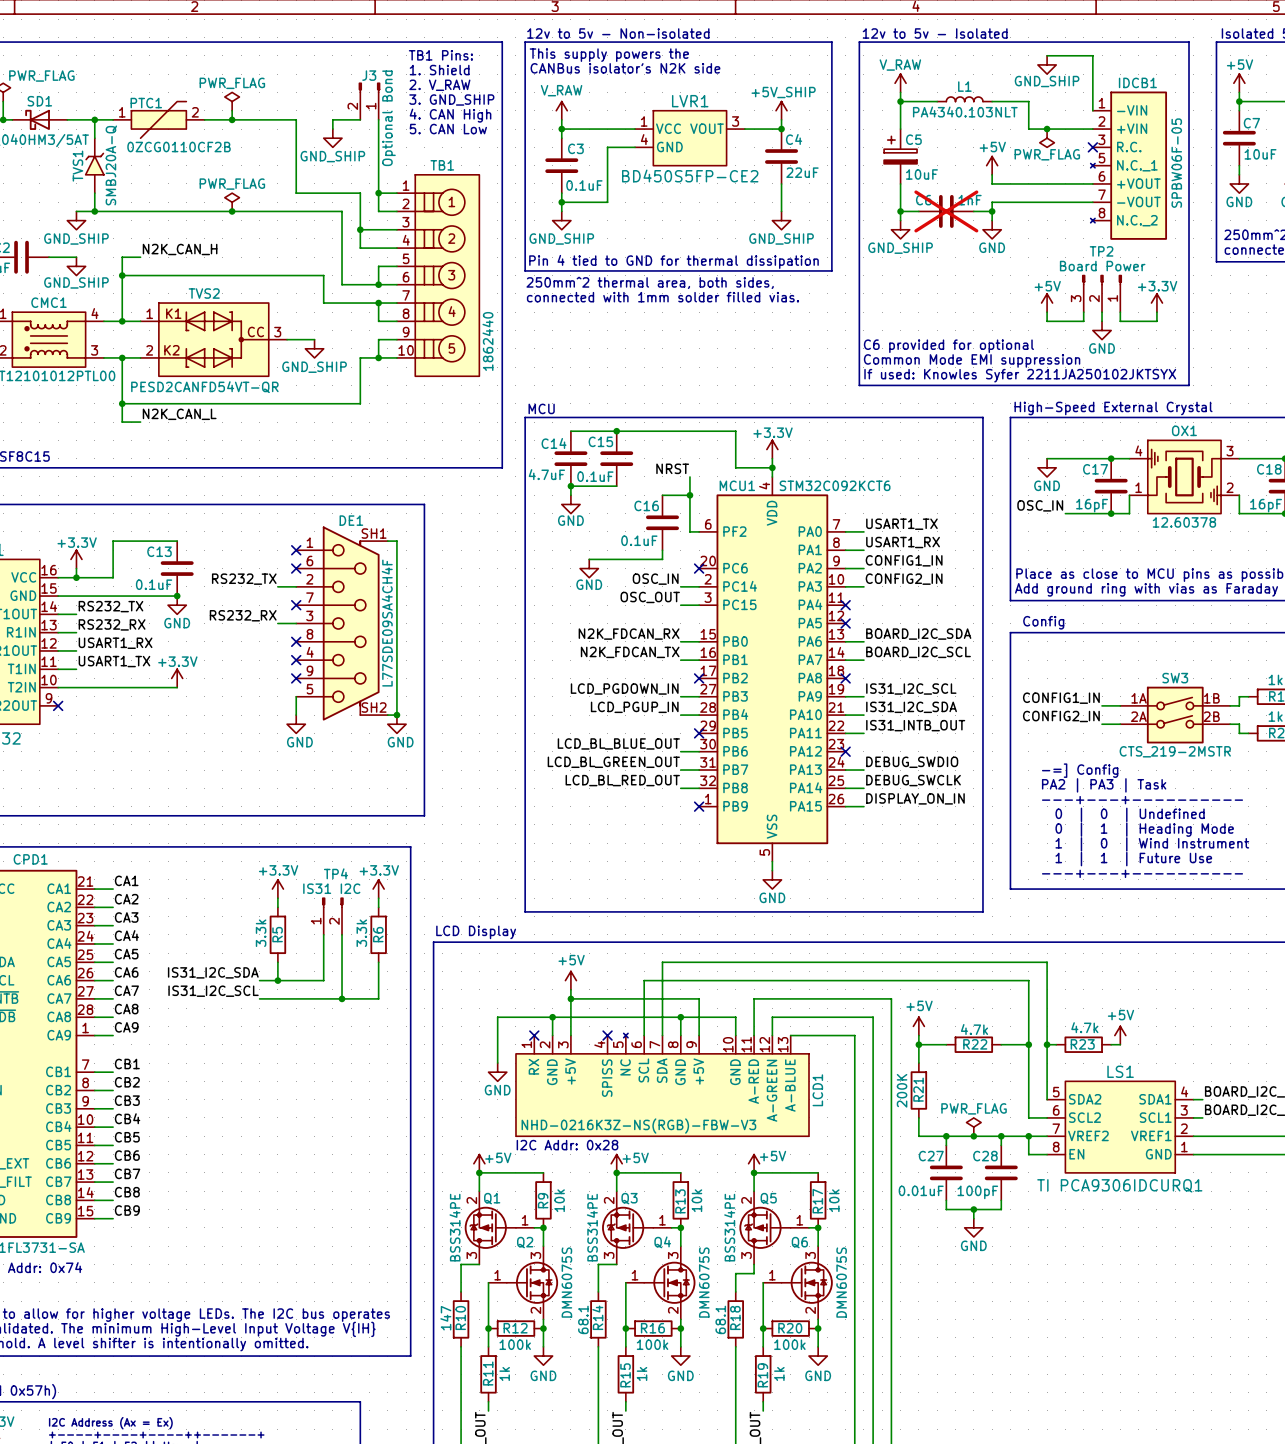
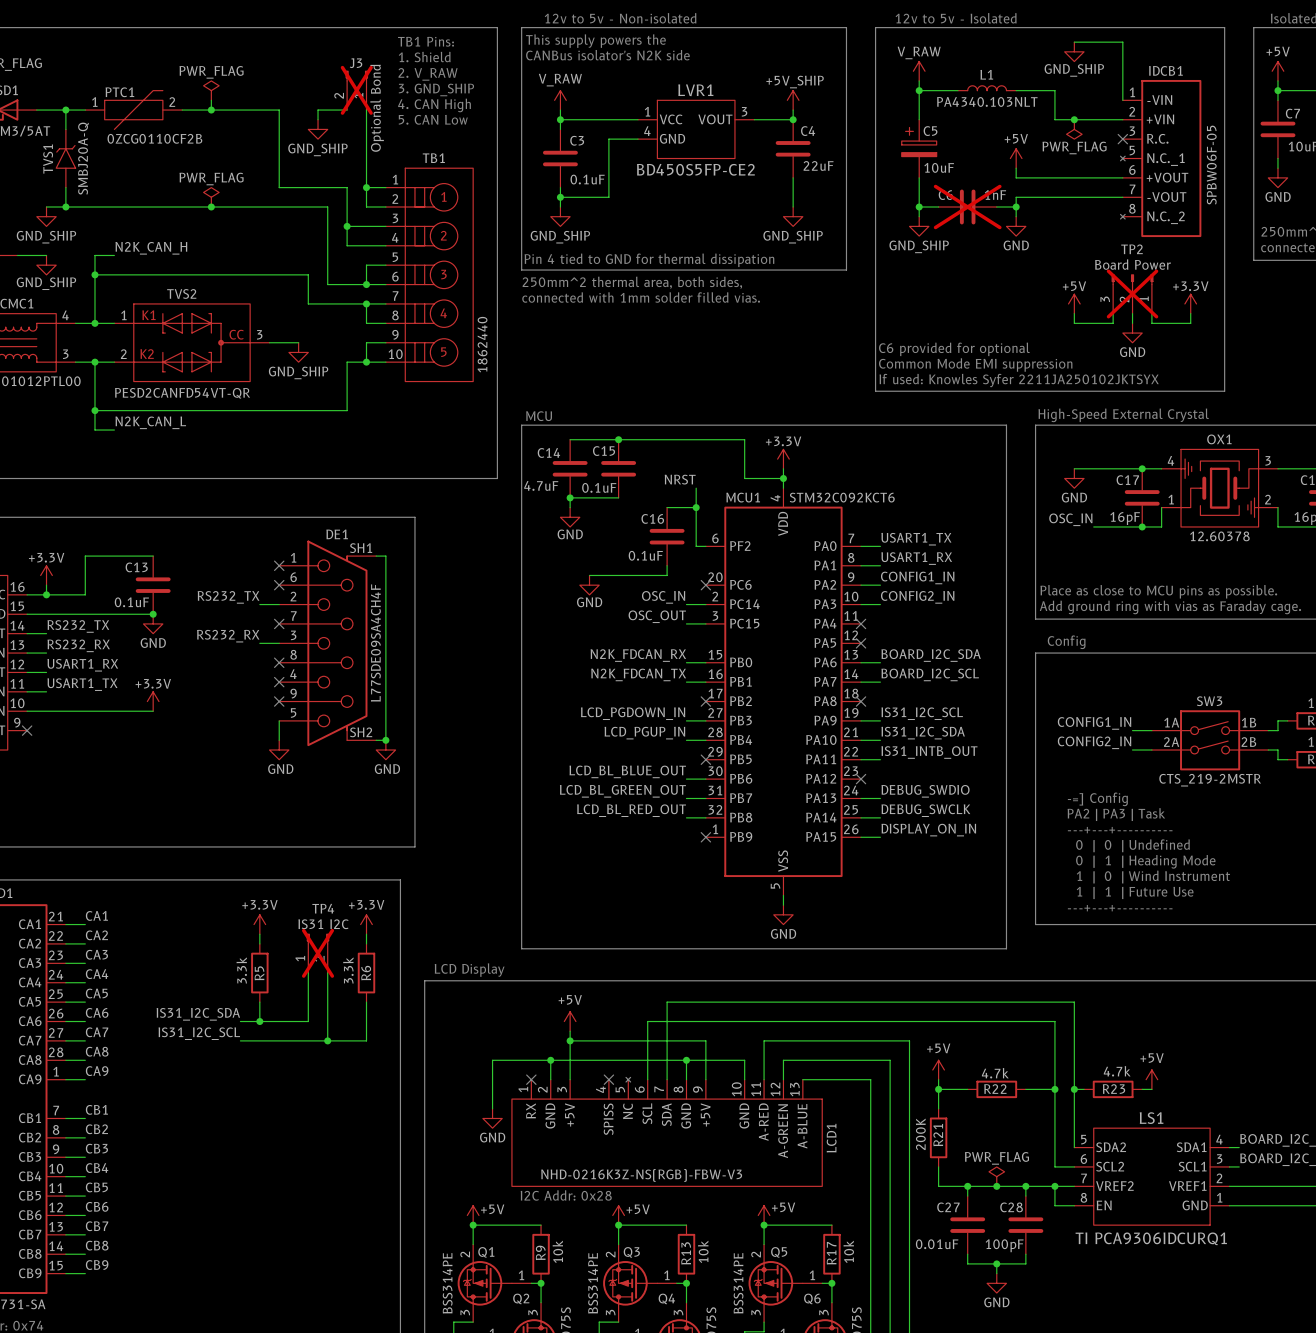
J3 do-not-place cross: none -> (356, 90)
TP2 do-not-place cross: none -> (1132, 293)
TP4 do-not-place cross: none -> (318, 953)

